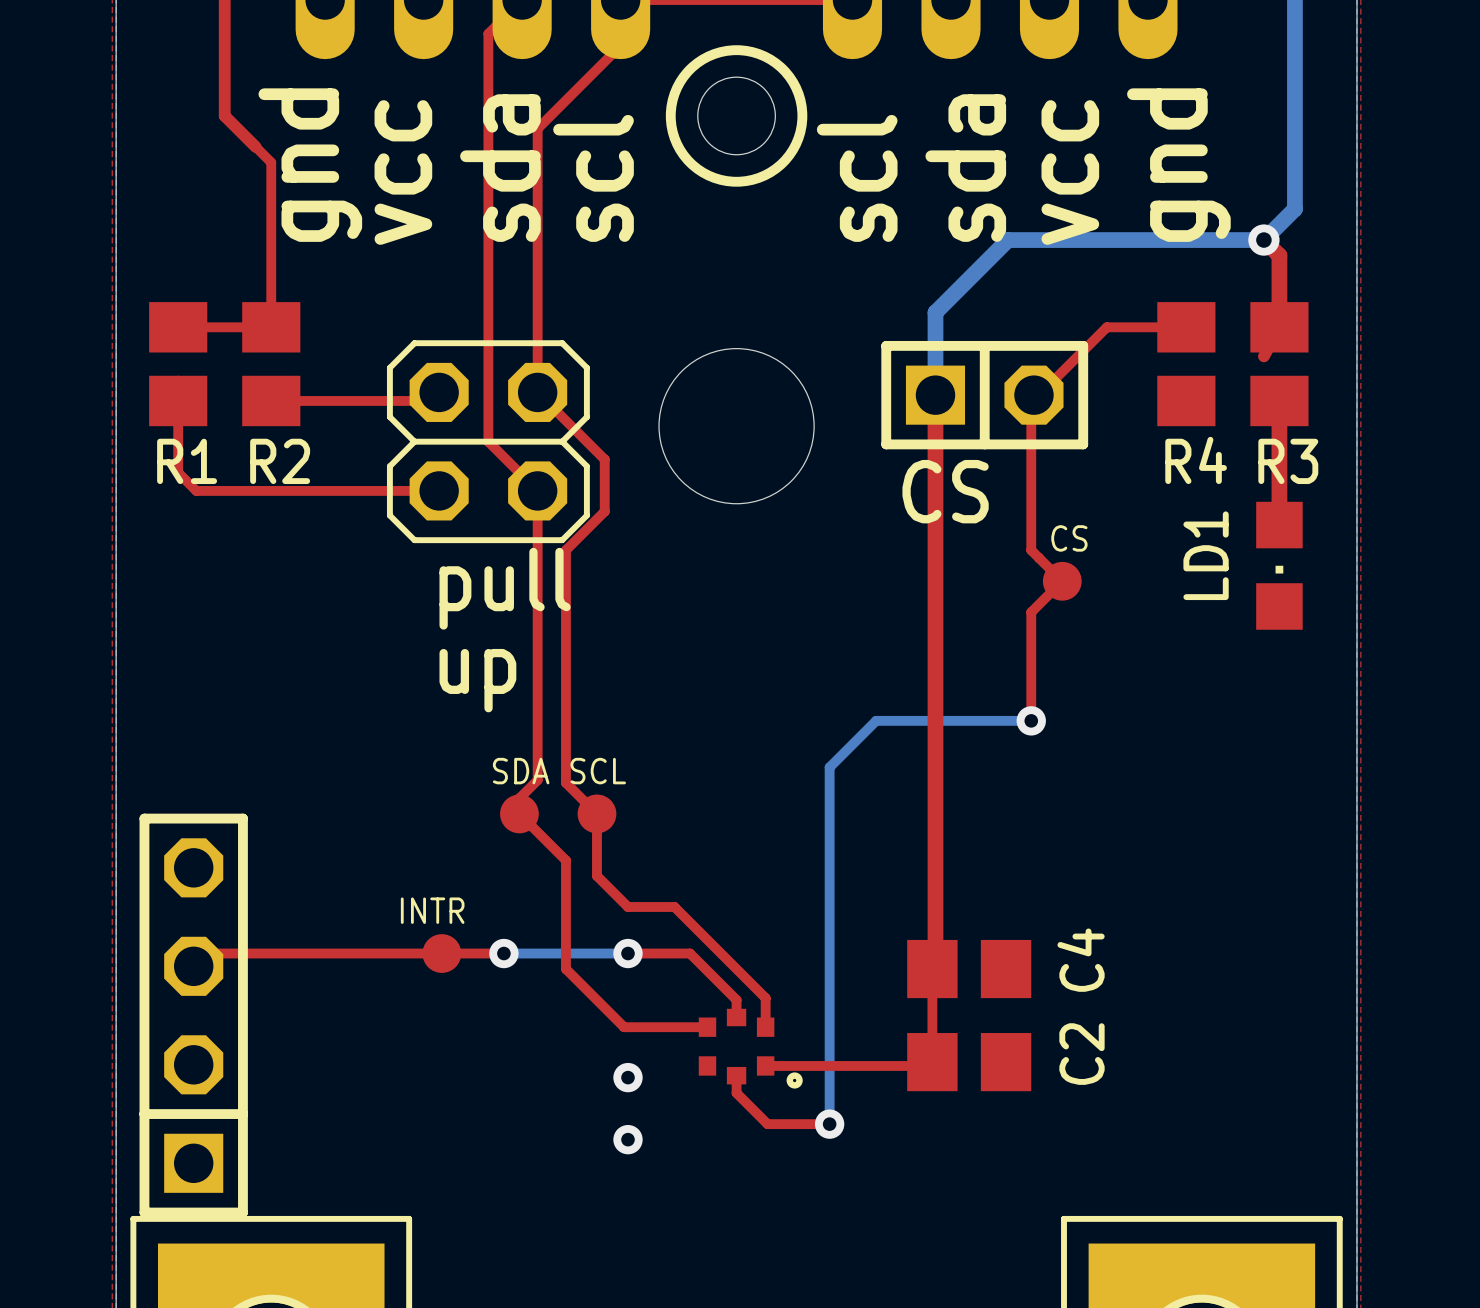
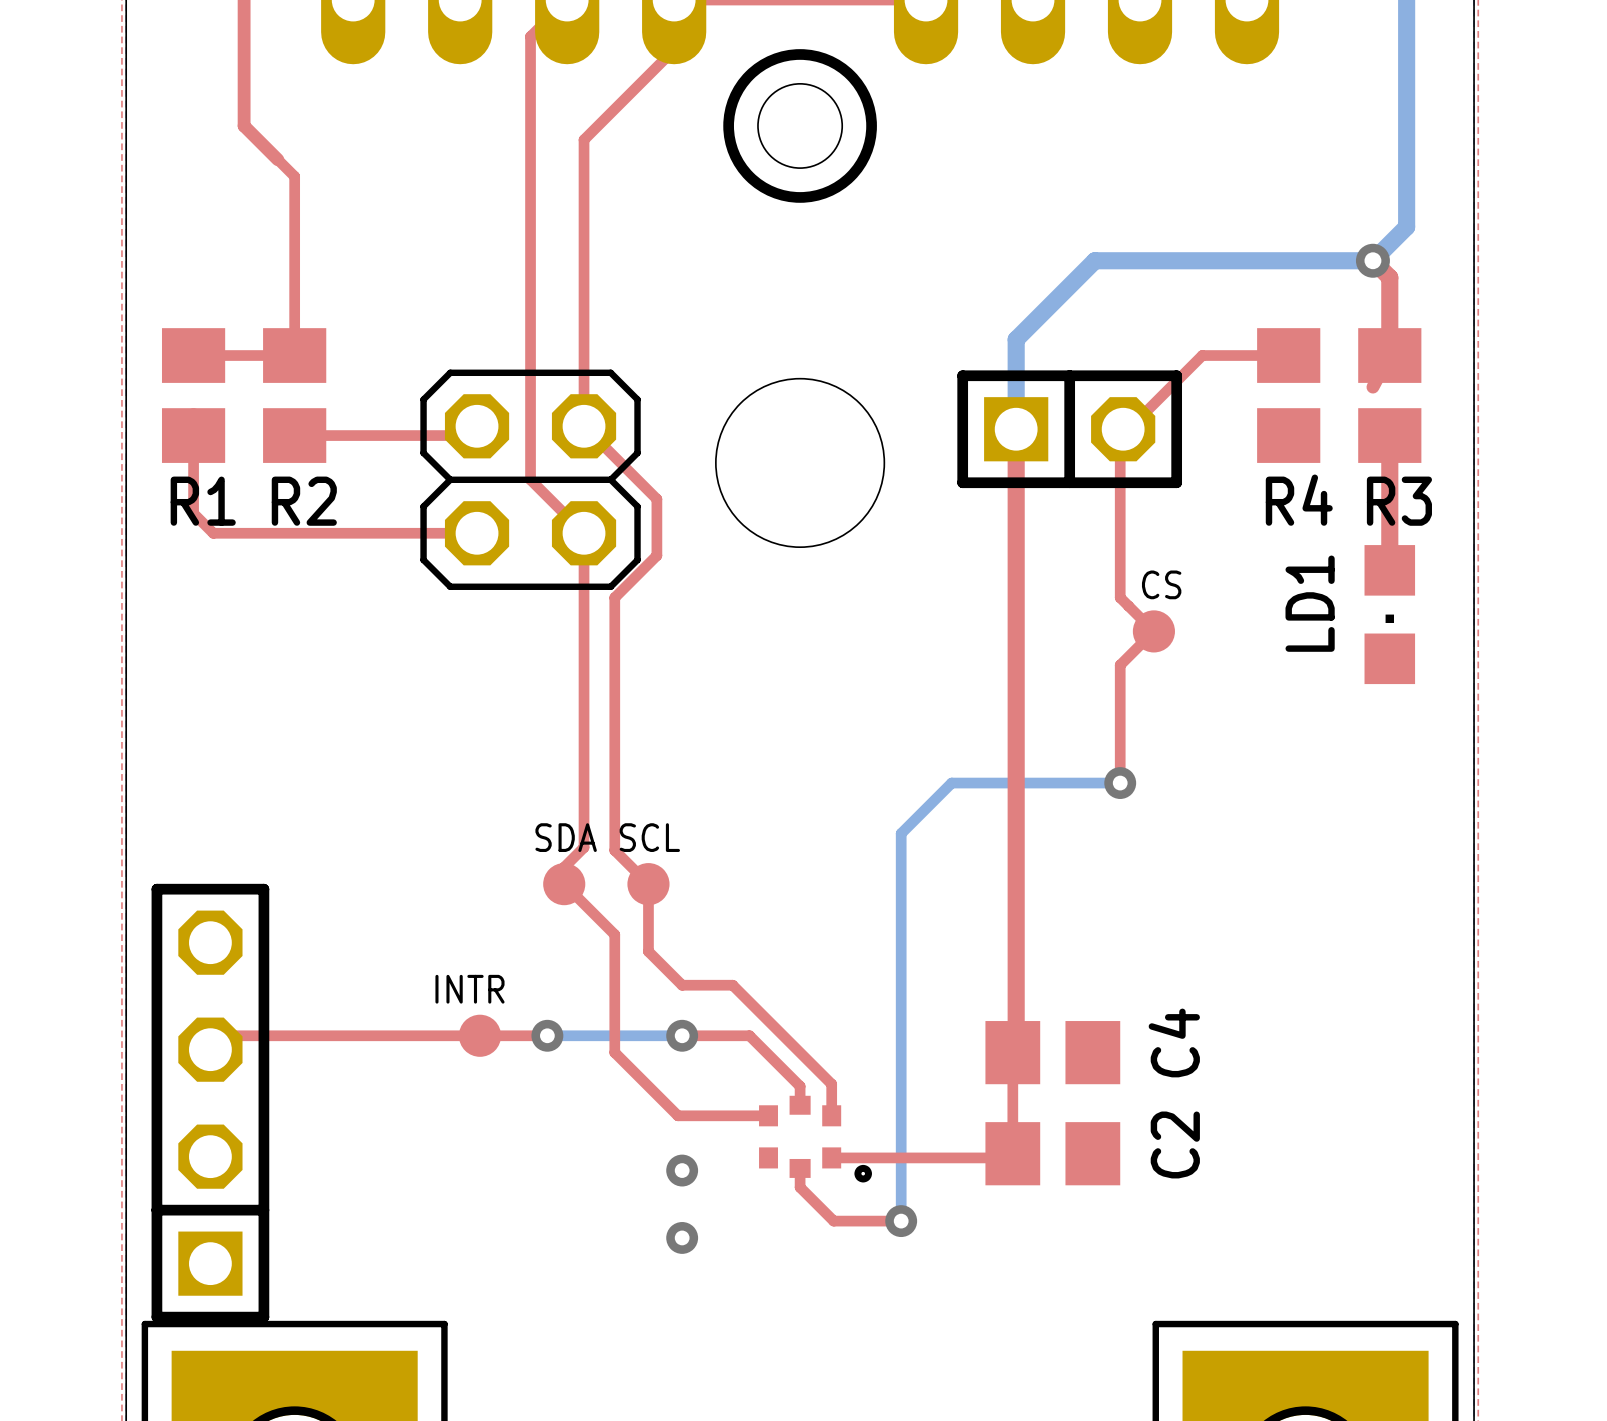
text: gnd (310, 165) -> none
text: gnd (1178, 165) -> none
text: sda (500, 168) -> none
text: sda (965, 168) -> none
text: vcc (403, 172) -> none
text: vcc (1070, 172) -> none
text: scl (593, 178) -> none
text: scl (857, 178) -> none
text: CS (945, 491) -> none
text: pull (505, 588) -> none
text: up (477, 680) -> none

